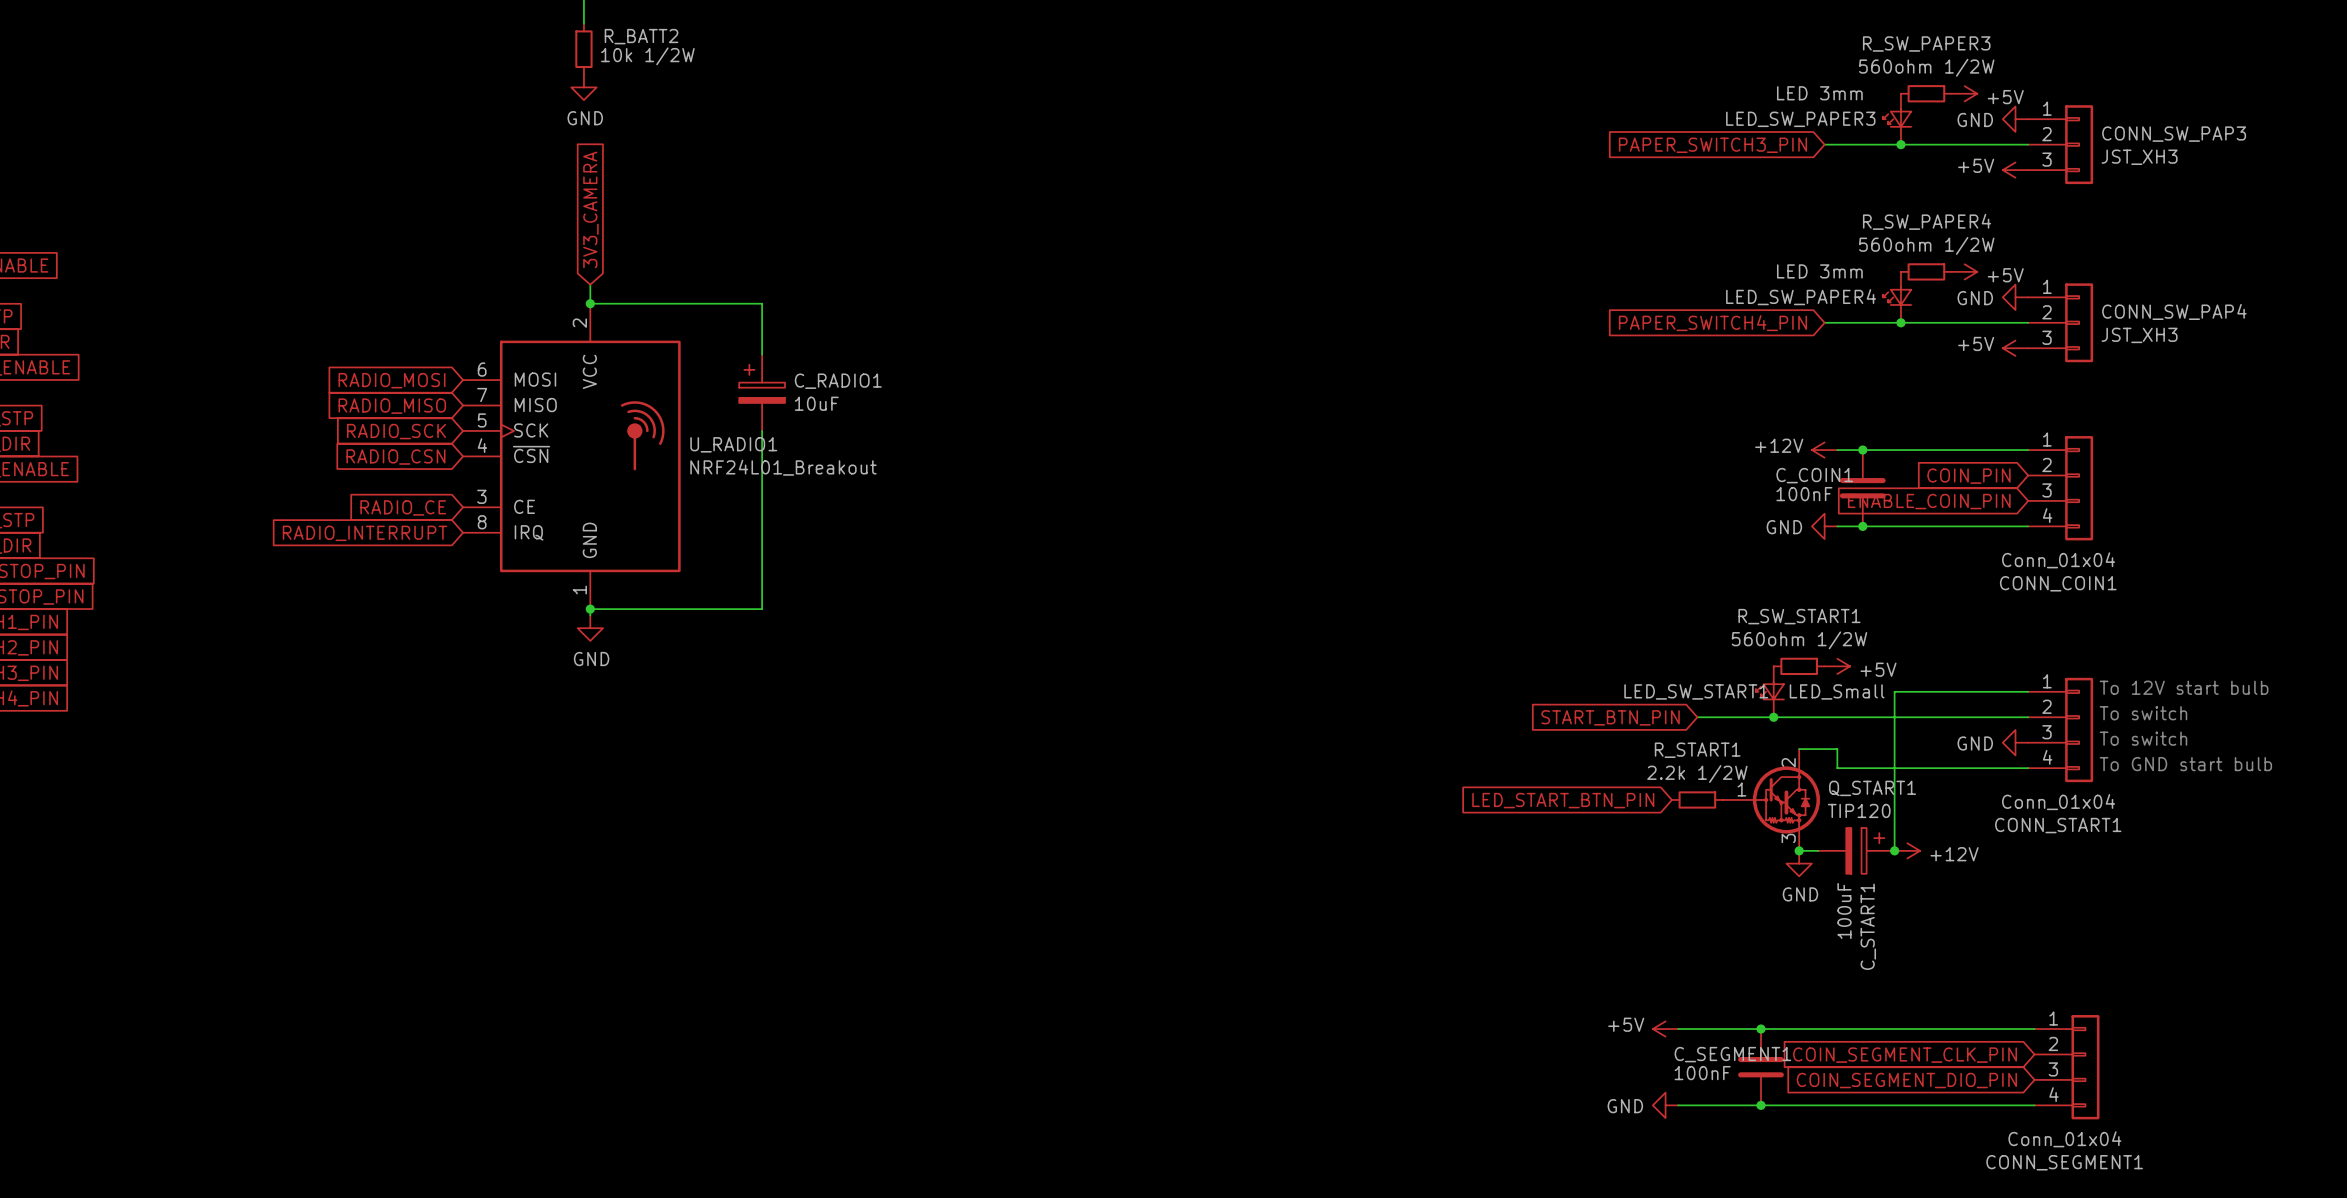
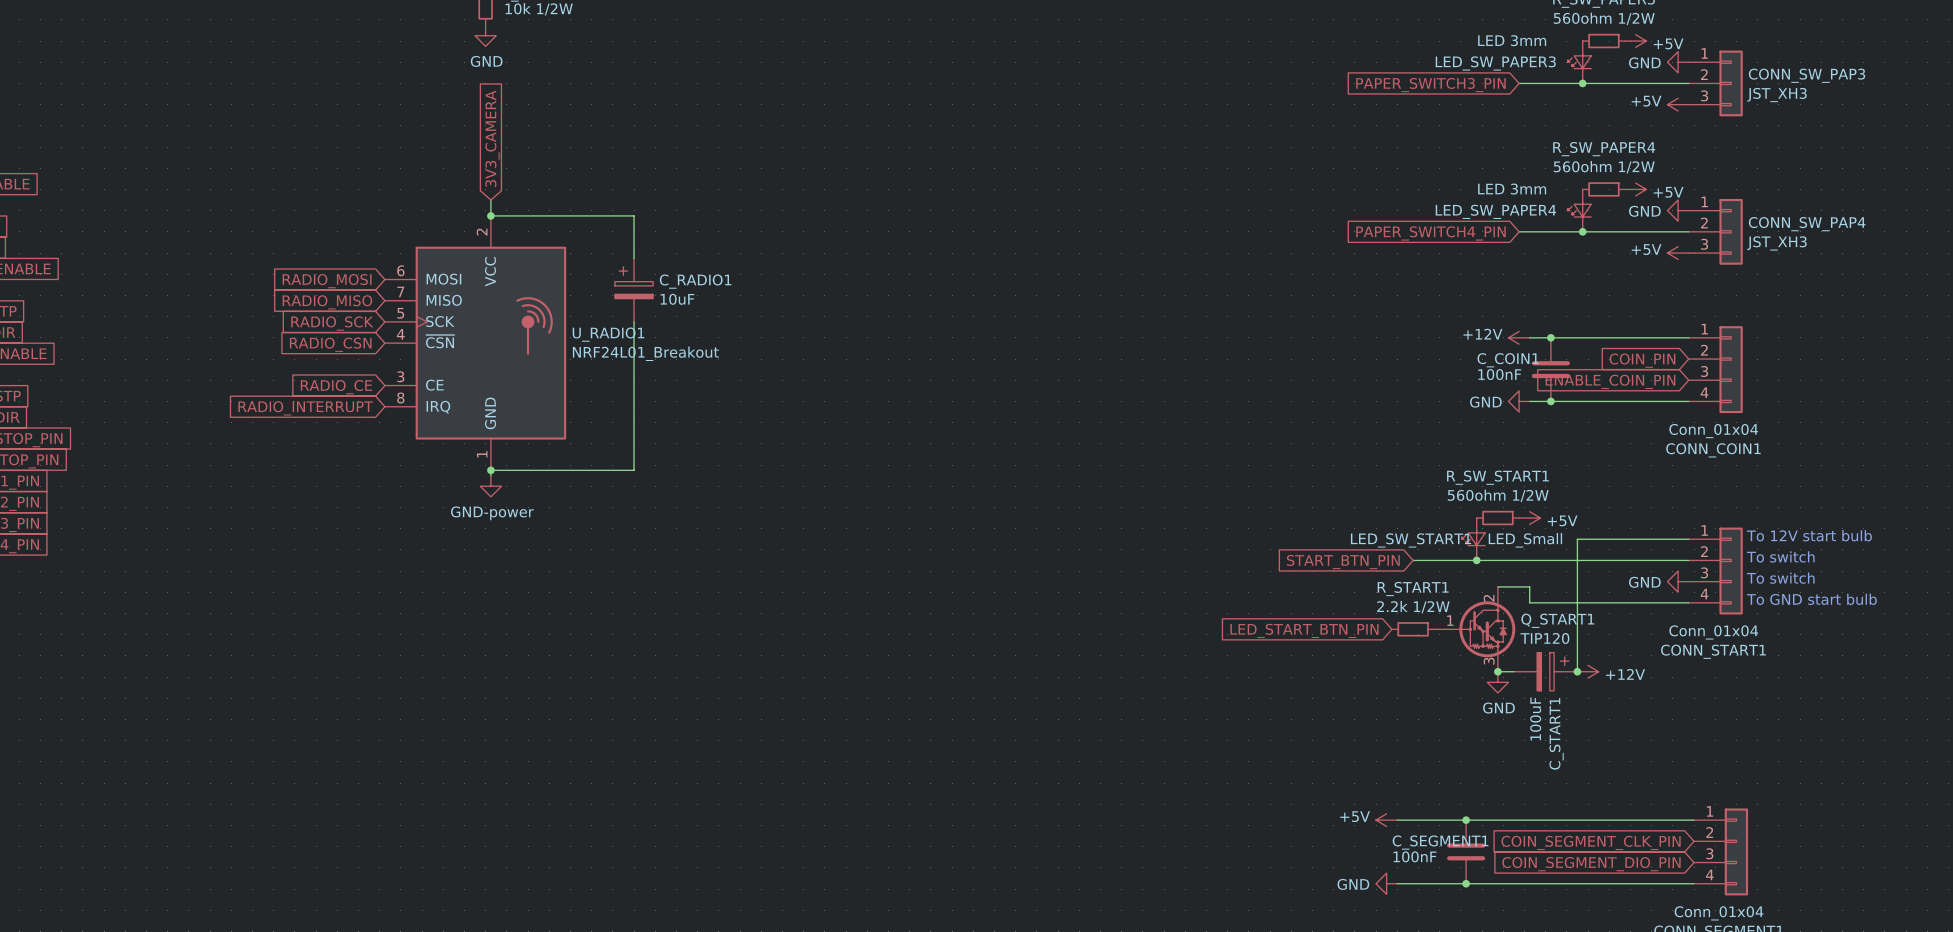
power symbol: GND (590, 628) -> GND-power (490, 486)

